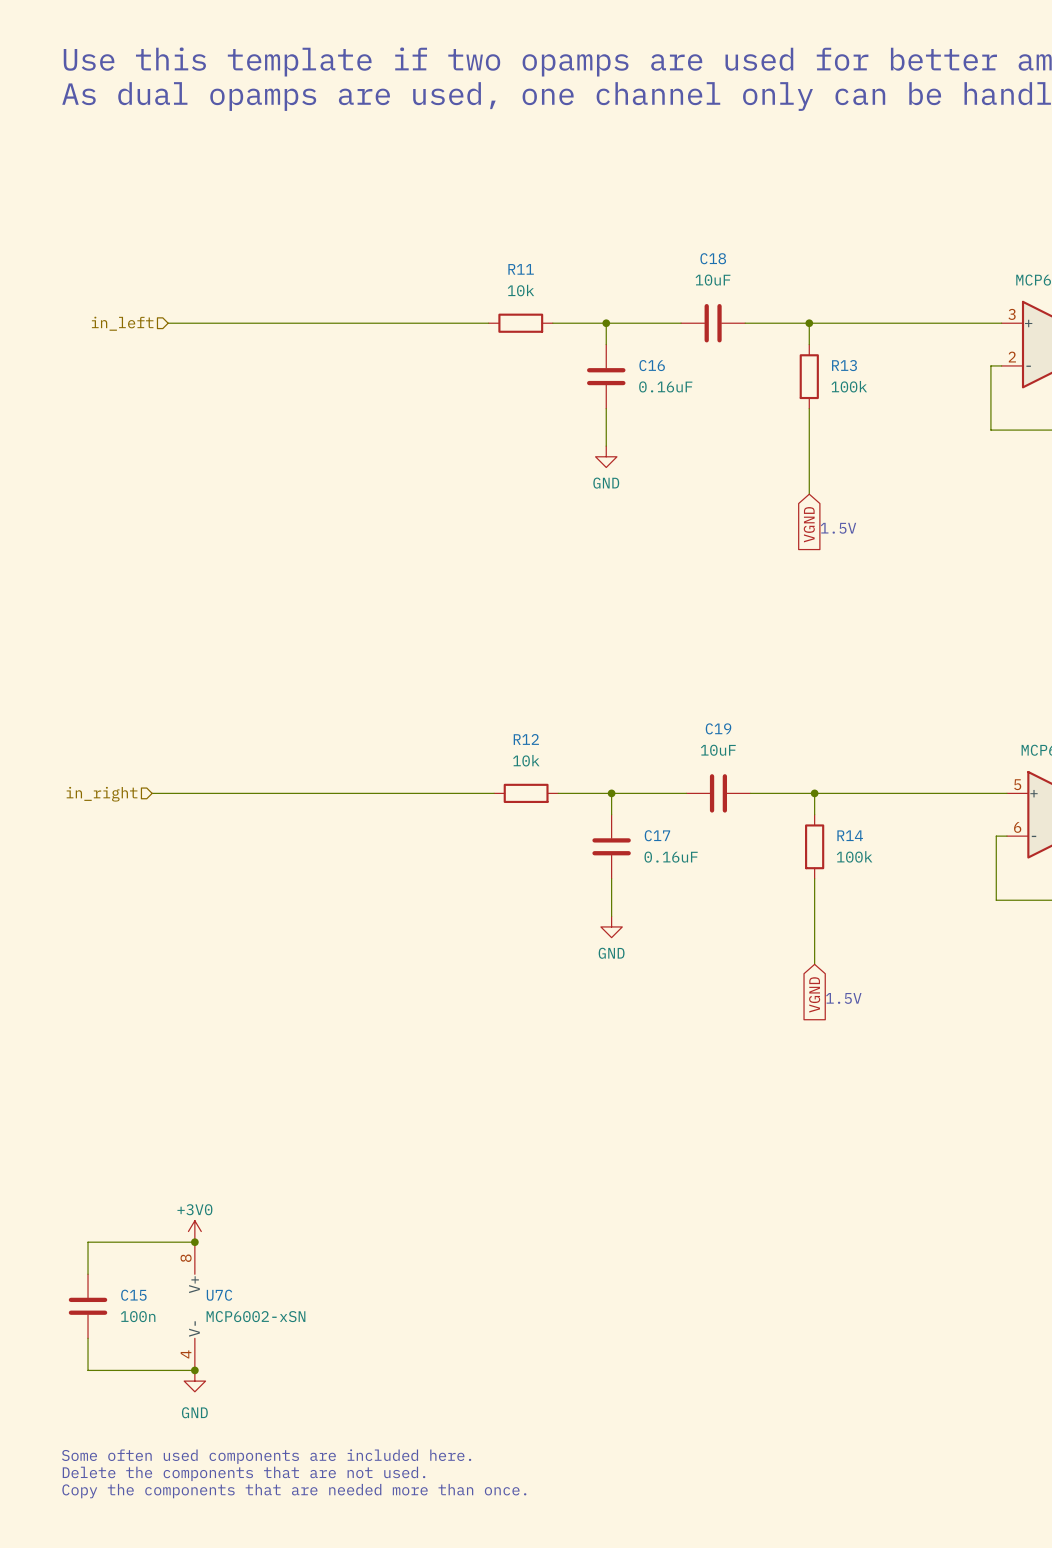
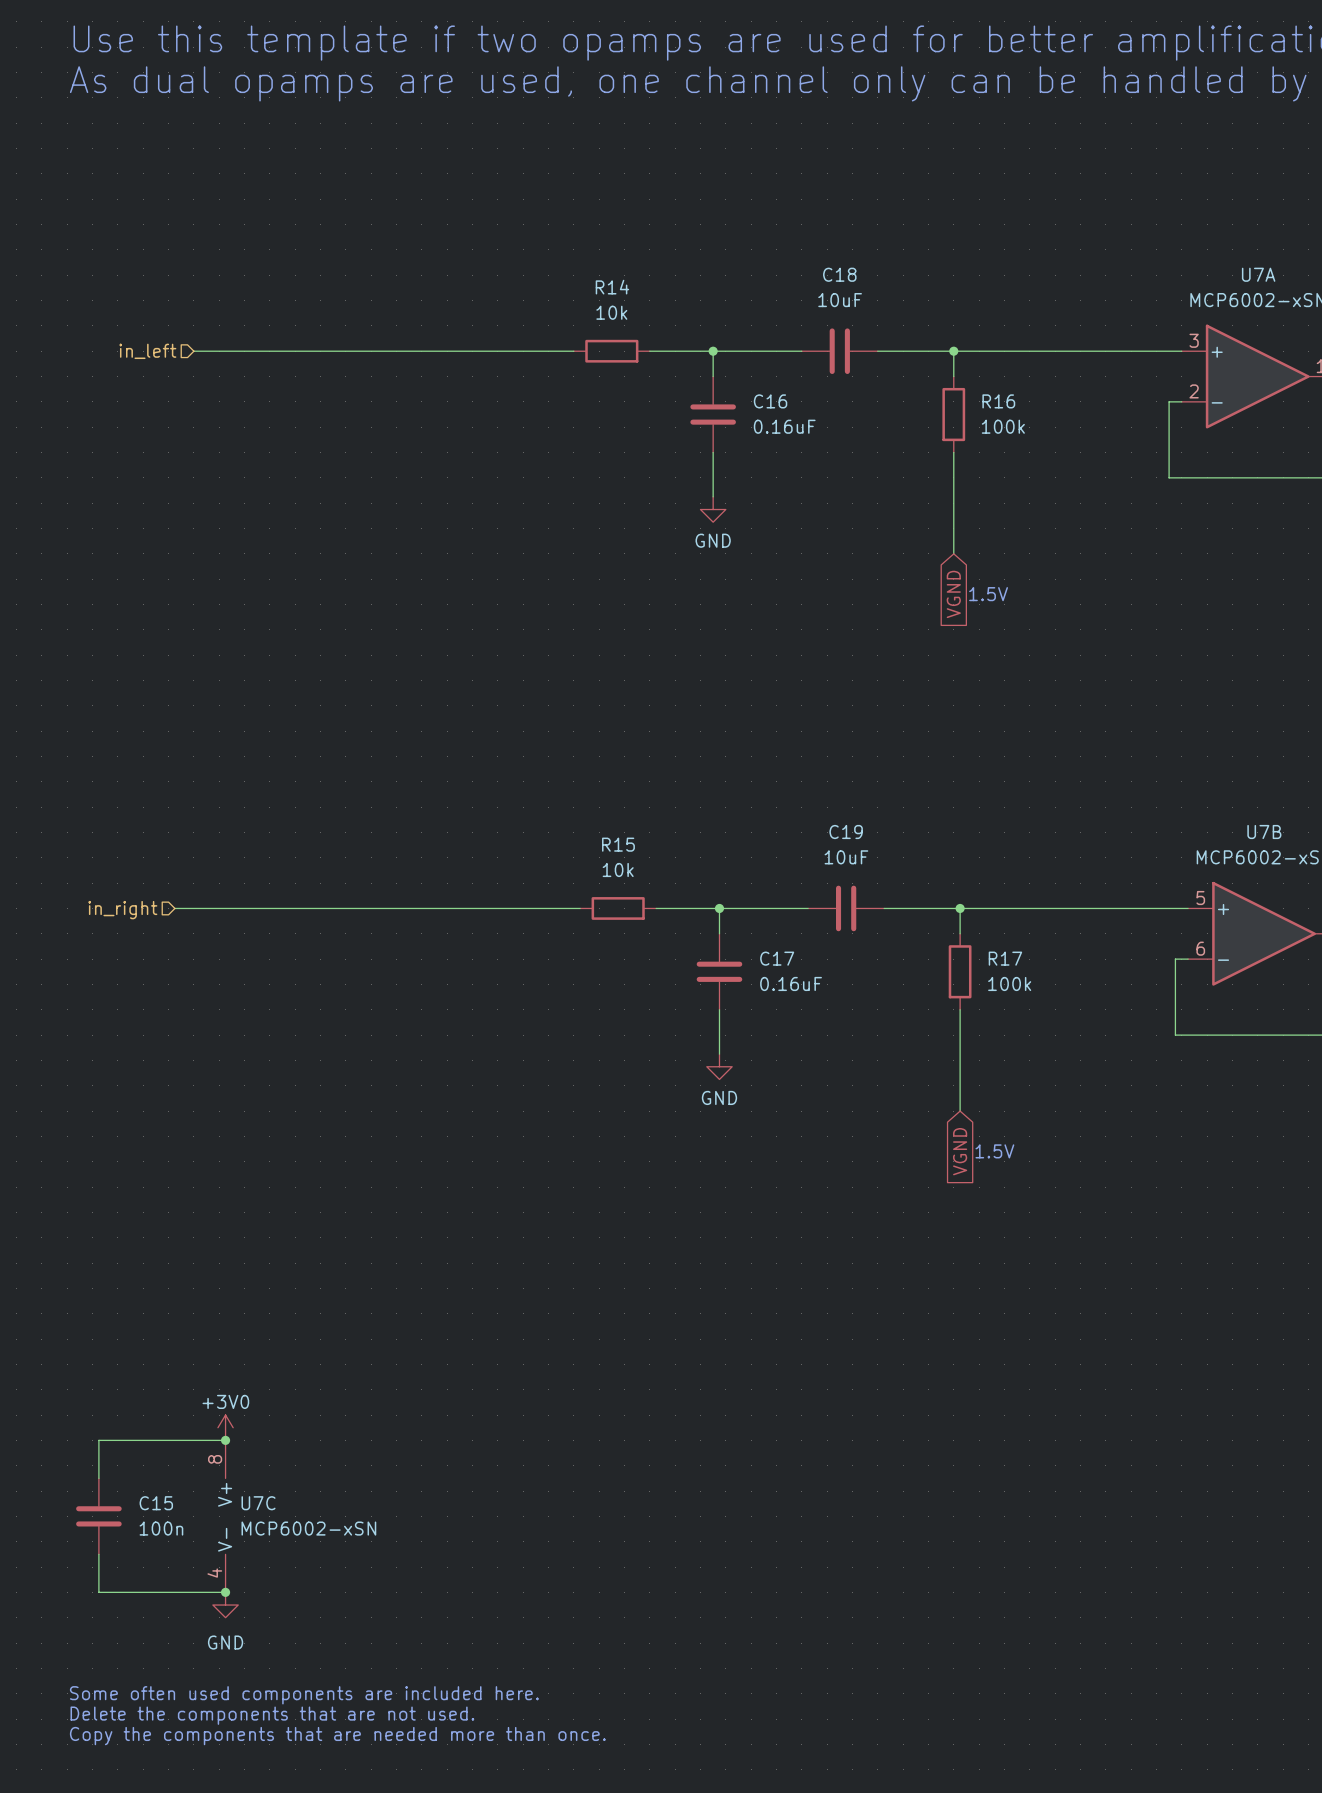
R11 name: R11 (521, 269) -> R14 (612, 287)
R13 name: R13 (844, 365) -> R16 (998, 401)
R12 name: R12 (526, 739) -> R15 (618, 844)
R14 name: R14 (850, 835) -> R17 (1005, 958)

